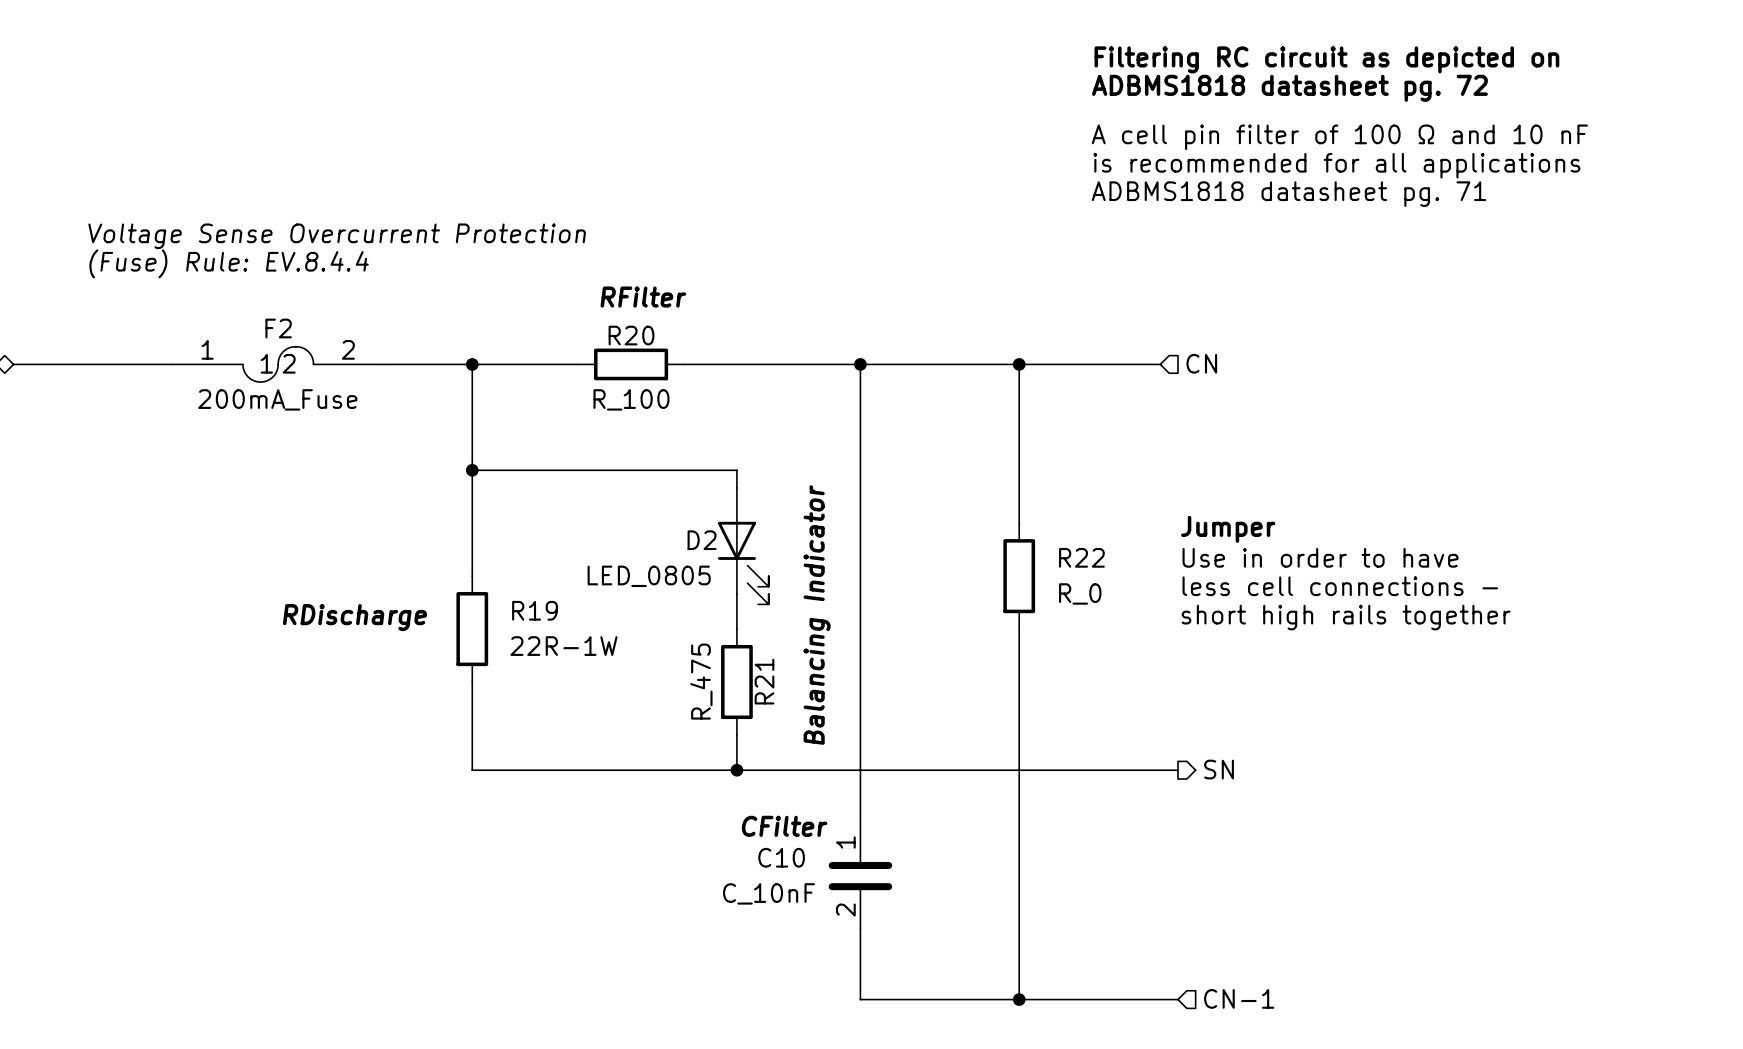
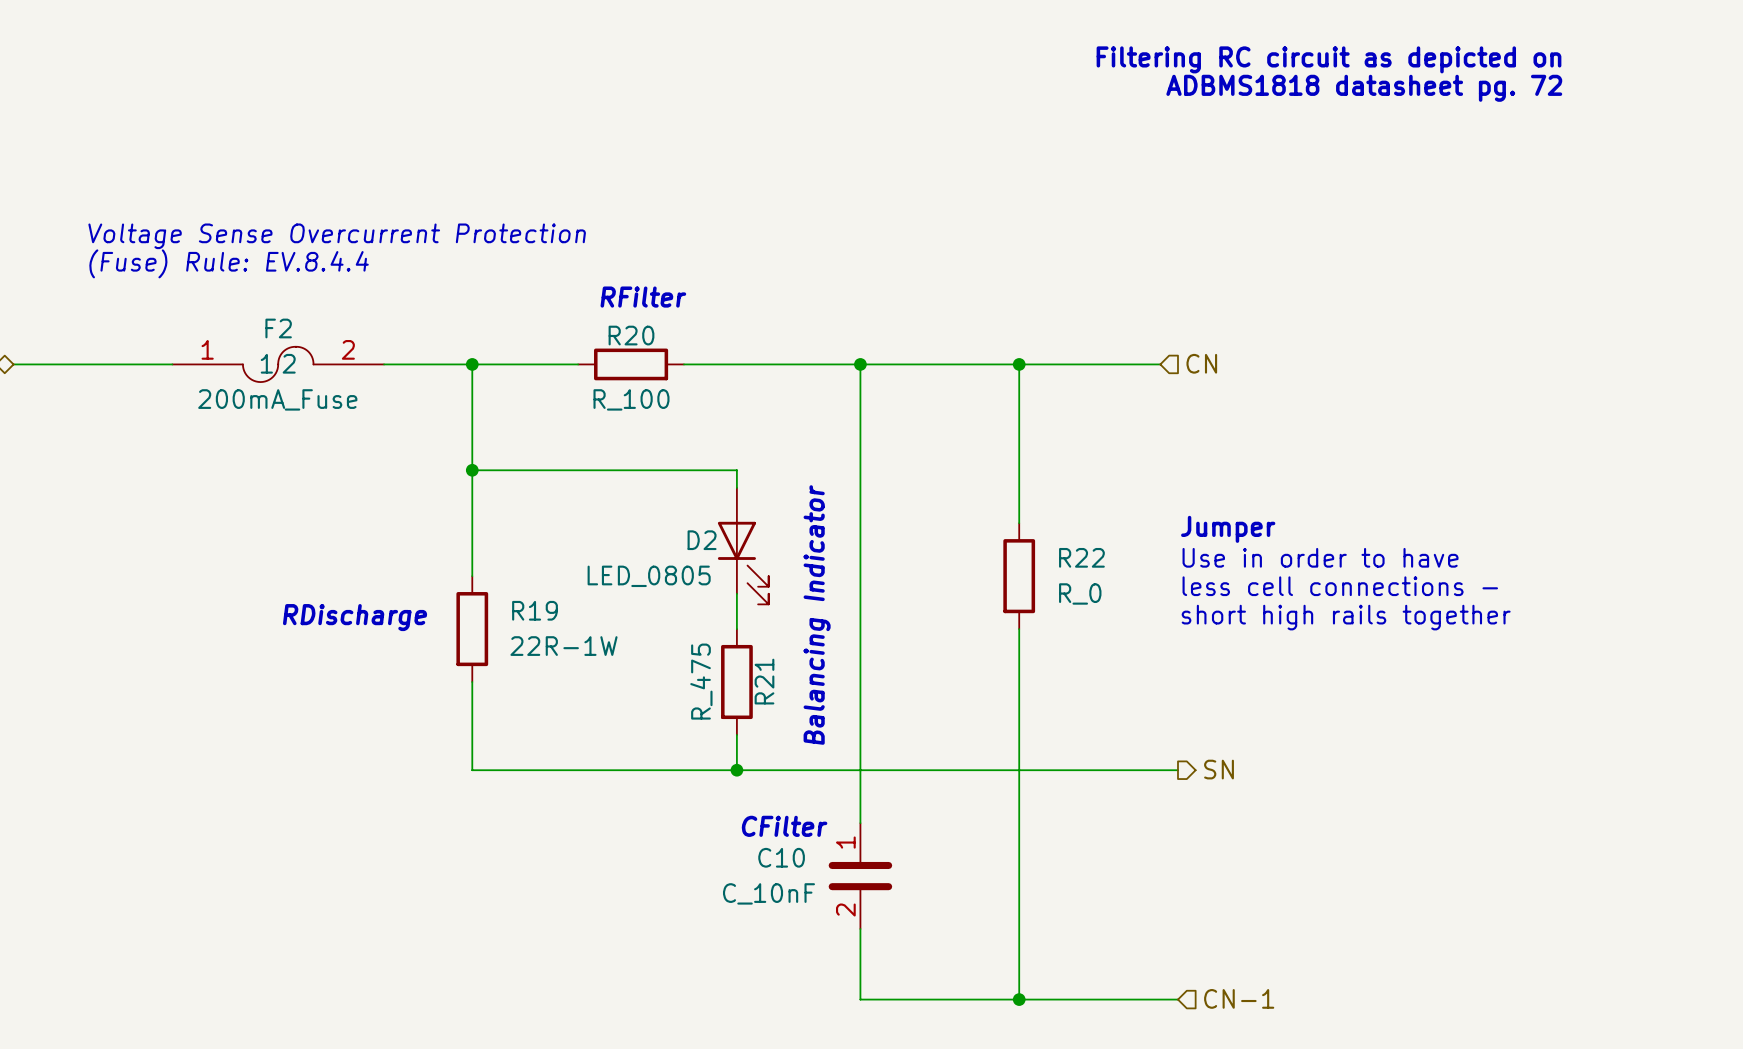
text: Filtering RC circuit as depicted on (1326, 59) -> none
text: none -> Filtering RC circuit as depicted on (1329, 59)
text: ADBMS1818 datasheet pg. 72 (1289, 88) -> none
text: none -> ADBMS1818 datasheet pg. 72 (1364, 88)
text: A cell pin filter of 100 Ω and 10 nF (1339, 137) -> none
text: is recommended for all applications (1336, 165) -> none
text: ADBMS1818 datasheet pg. 71 (1289, 194) -> none

